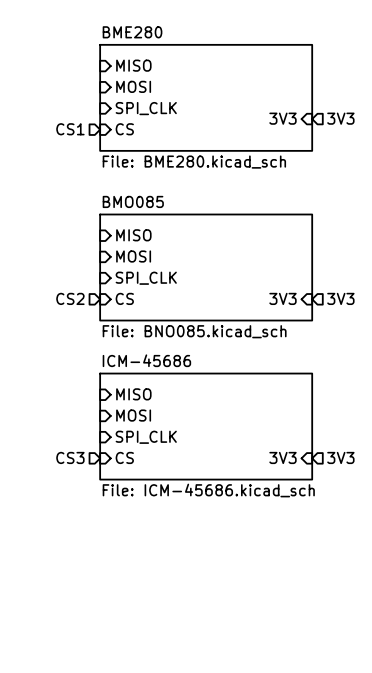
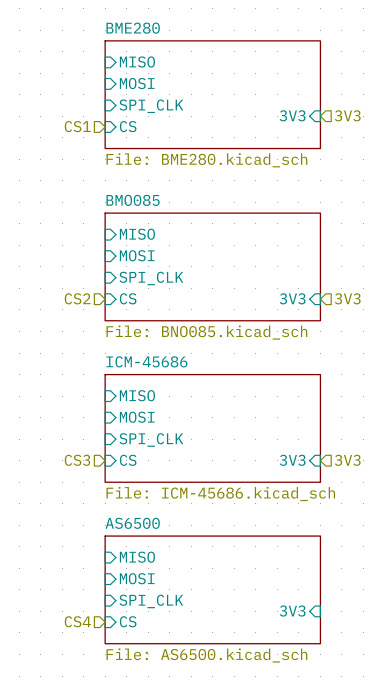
sheet pin: none -> MISO (137, 557)
sheet pin: none -> MOSI (137, 578)
sheet AS6500: none -> File: AS6500.kicad_sch (212, 589)
sheet pin: none -> SPI_CLK (151, 601)
sheet pin: none -> 3V3 (292, 611)
hierarchical label: none -> CS4 (77, 621)
sheet pin: none -> CS (128, 621)

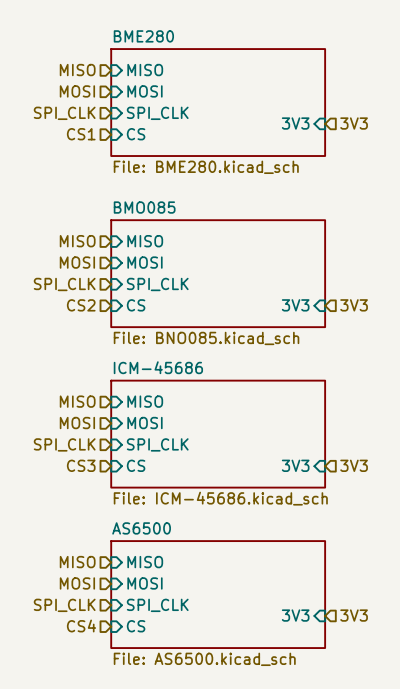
hierarchical label: none -> MISO (77, 70)
hierarchical label: none -> MOSI (77, 91)
hierarchical label: none -> SPI_CLK (64, 113)
hierarchical label: none -> MISO (77, 241)
hierarchical label: none -> MOSI (77, 262)
hierarchical label: none -> SPI_CLK (64, 284)
hierarchical label: none -> MISO (77, 401)
hierarchical label: none -> MOSI (77, 423)
hierarchical label: none -> SPI_CLK (64, 444)
hierarchical label: none -> MISO (77, 562)
hierarchical label: none -> MOSI (77, 583)
hierarchical label: none -> SPI_CLK (64, 605)
hierarchical label: none -> 3V3 (354, 615)

